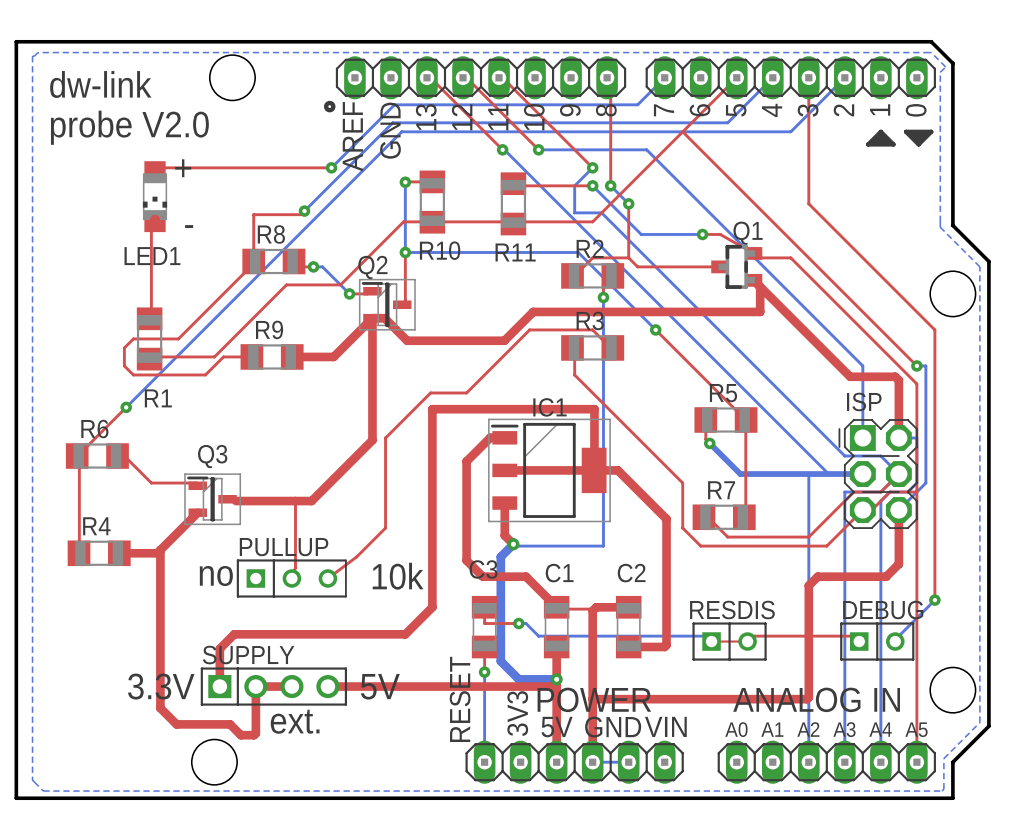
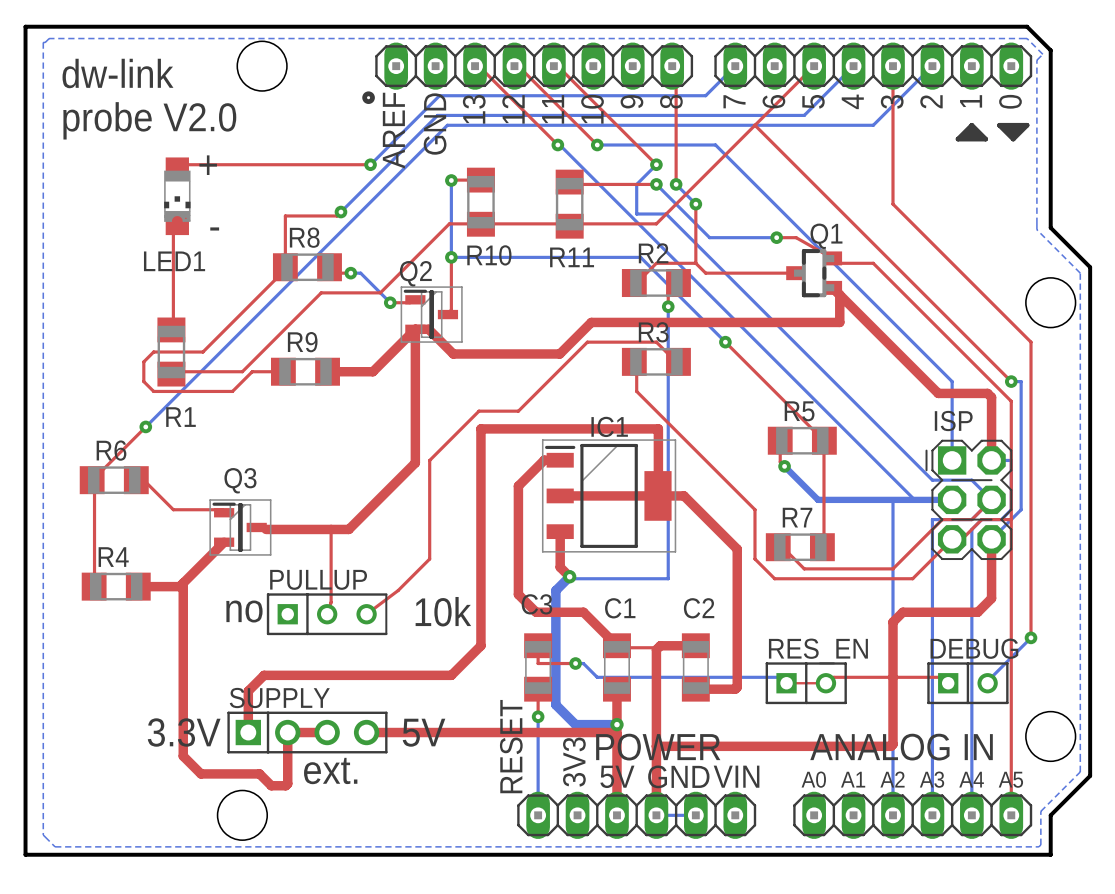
RESDIS name: RESDIS (732, 610) -> RES_EN (818, 651)

